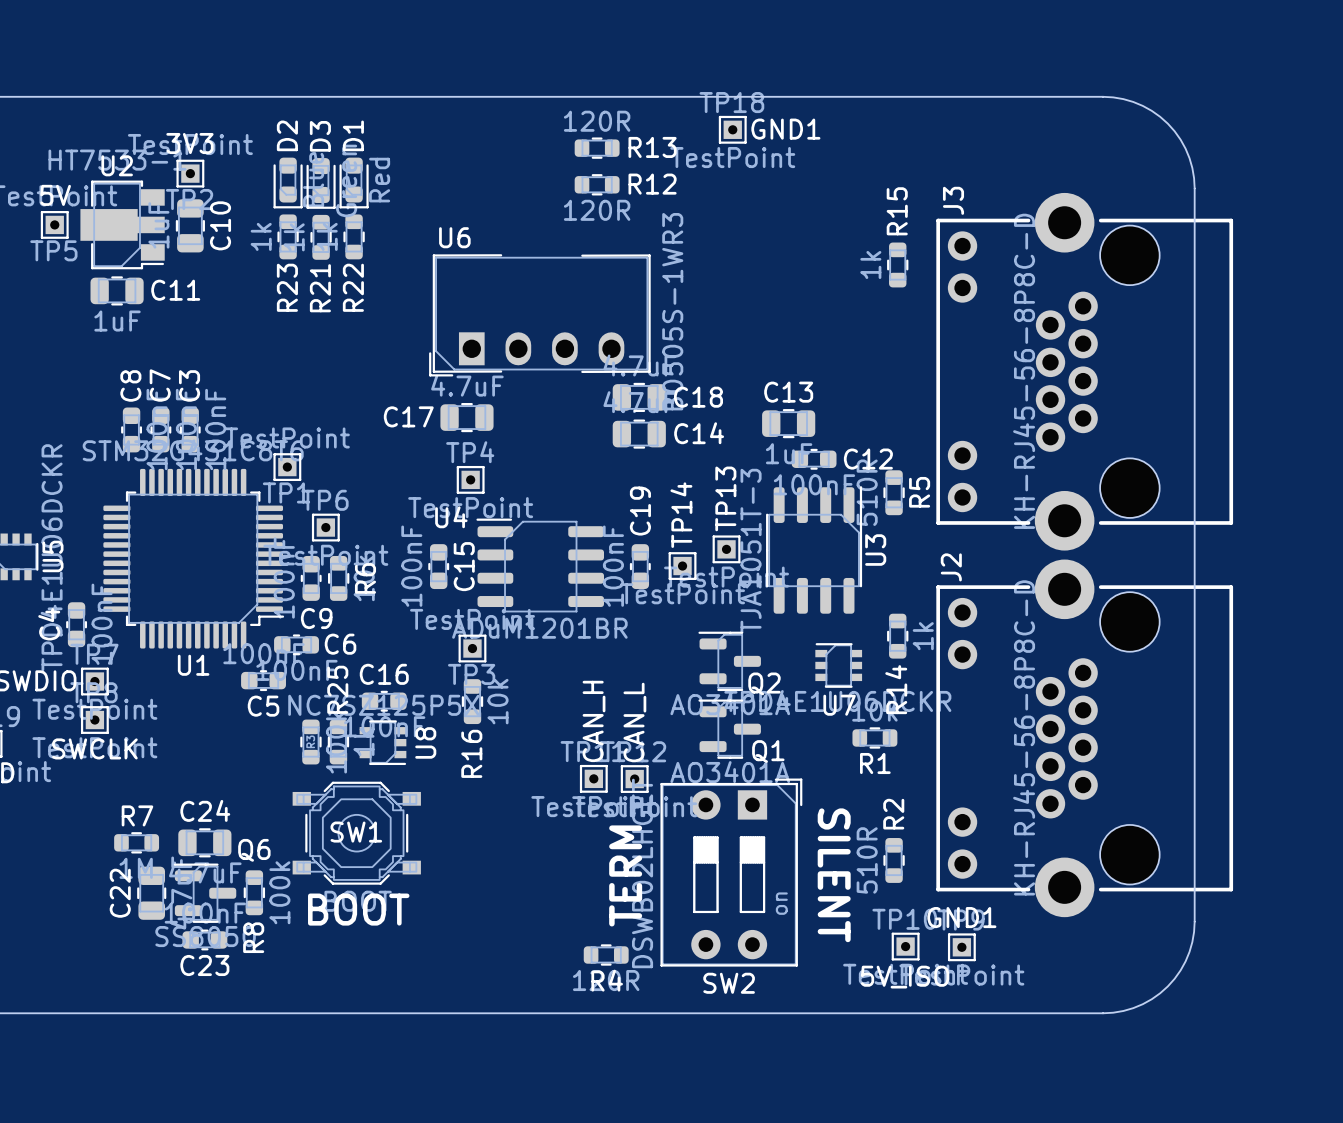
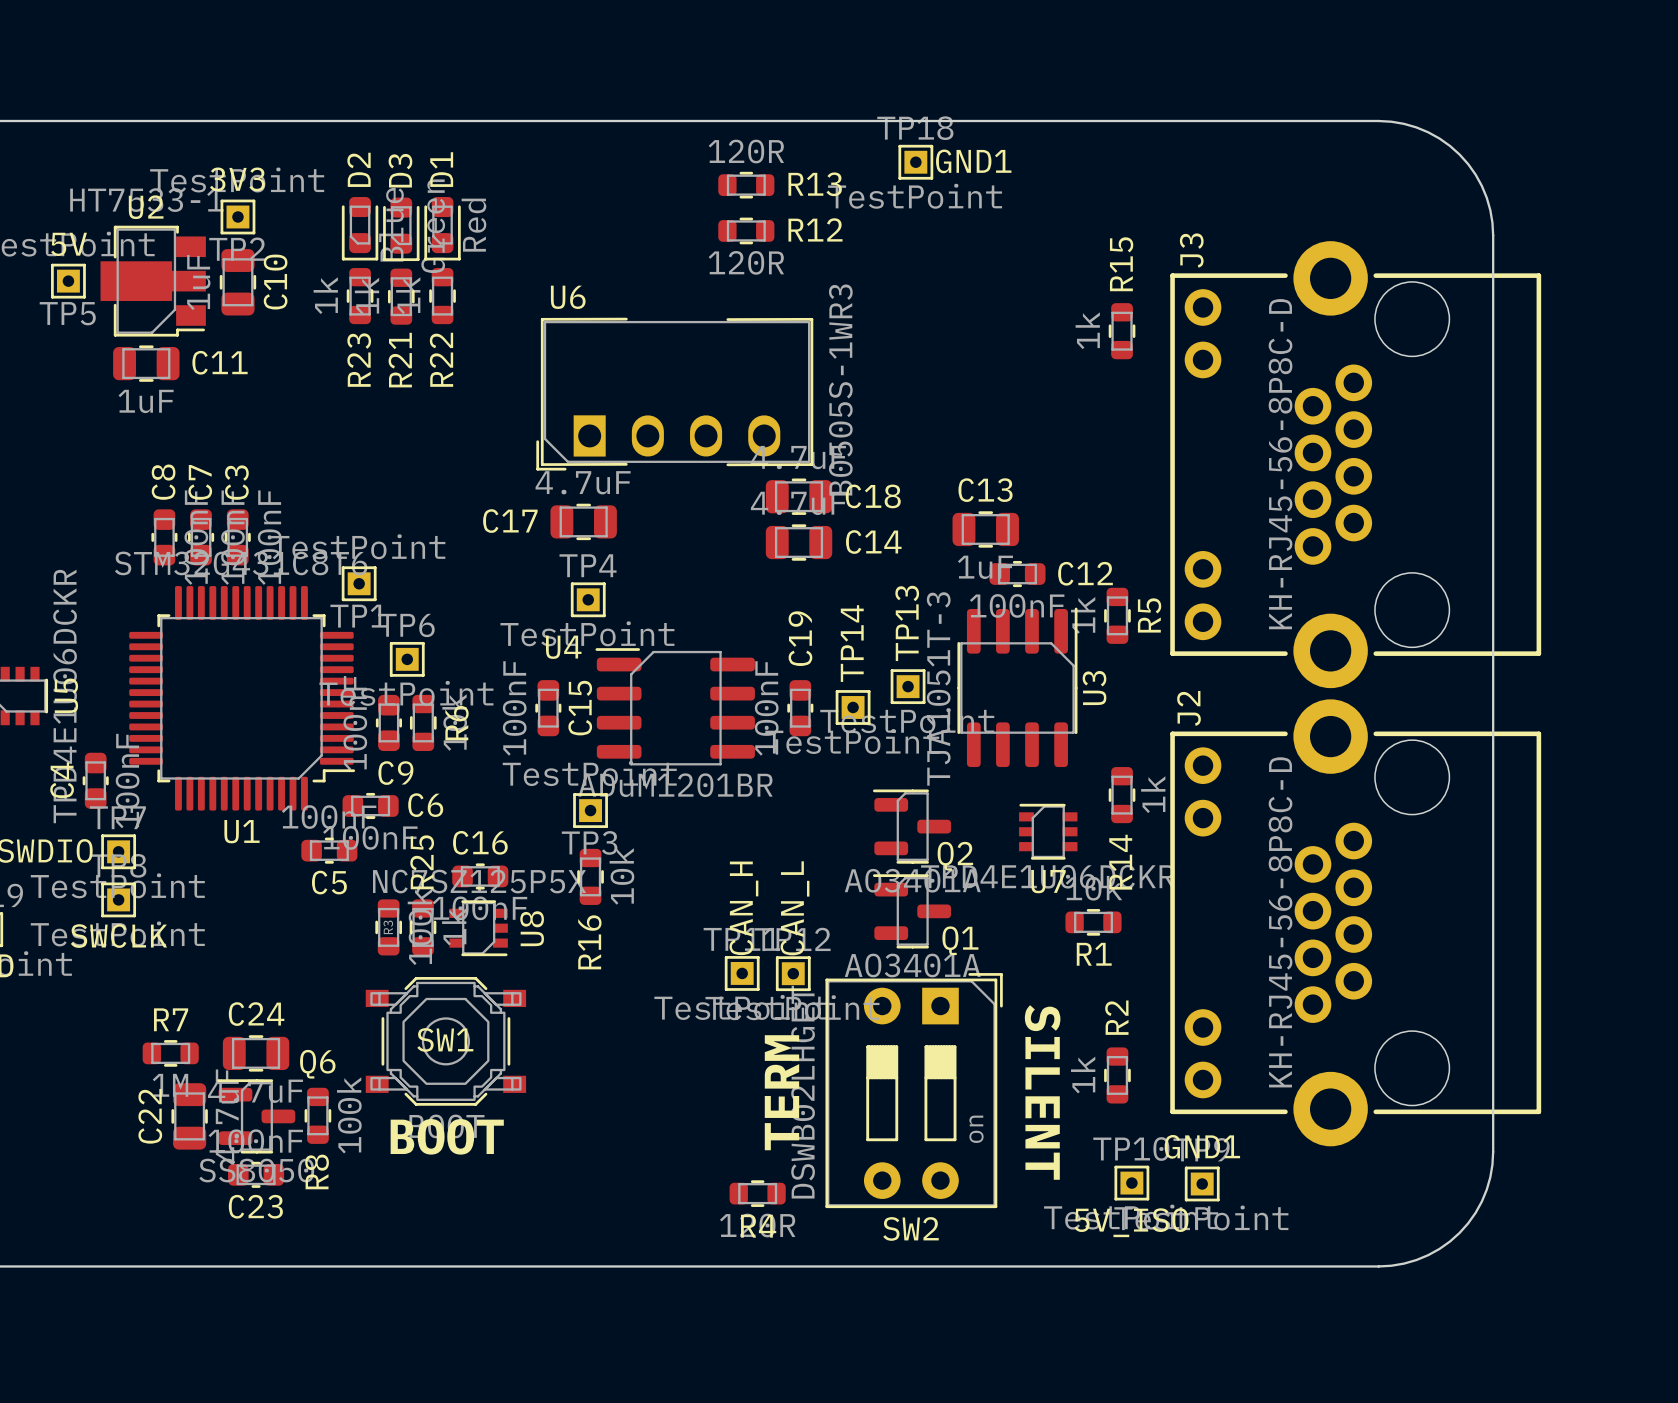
R5 value: 510R (867, 492) -> 1k (1083, 615)
R2 value: 510R (867, 860) -> 1k (1083, 1075)

